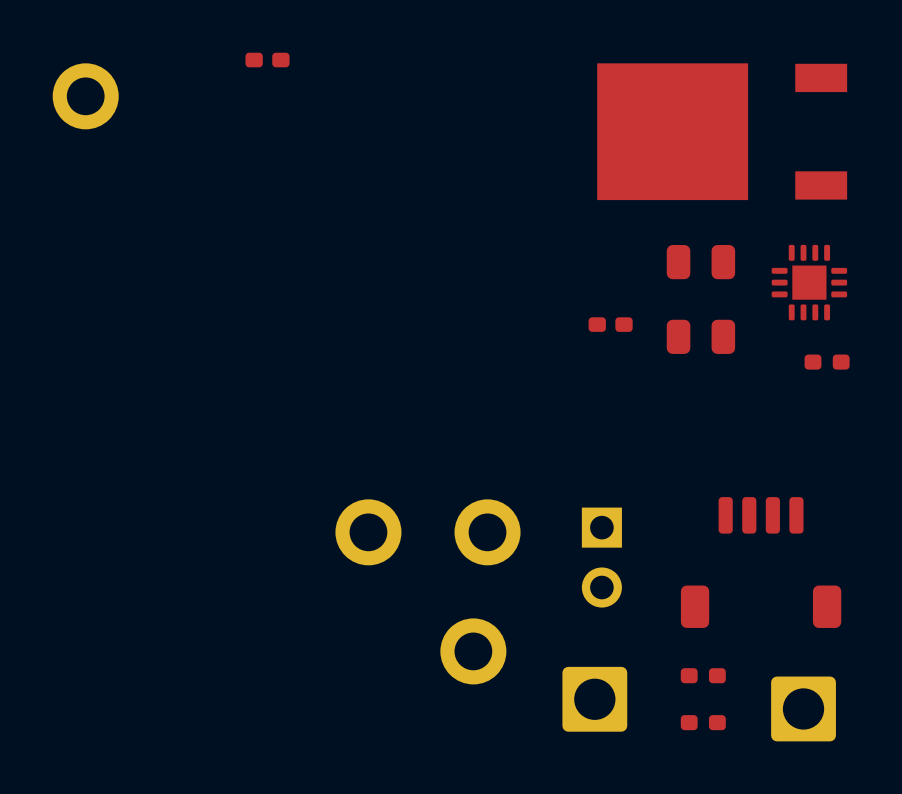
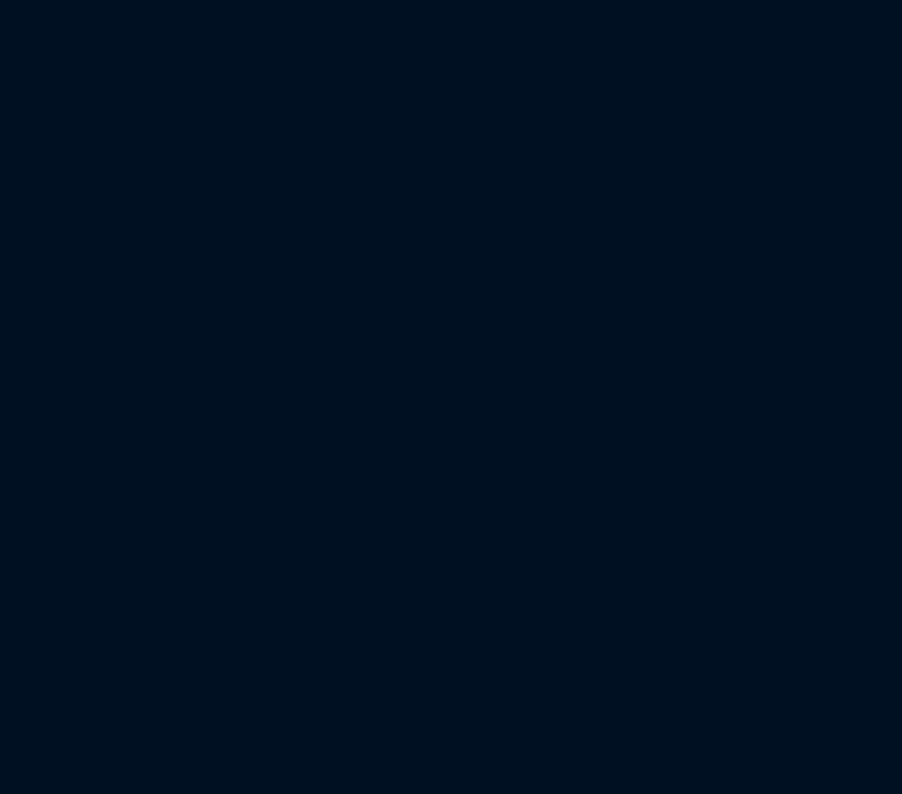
part: (267, 60) -> none
part: (85, 96) -> none
part: (722, 131) -> none
part: (700, 262) -> none
part: (809, 282) -> none
part: (610, 324) -> none
part: (700, 336) -> none
part: (827, 362) -> none
part: (368, 532) -> none
part: (487, 532) -> none
part: (601, 557) -> none
part: (761, 562) -> none
part: (473, 651) -> none
part: (703, 675) -> none
part: (594, 699) -> none
part: (803, 708) -> none
part: (703, 722) -> none

